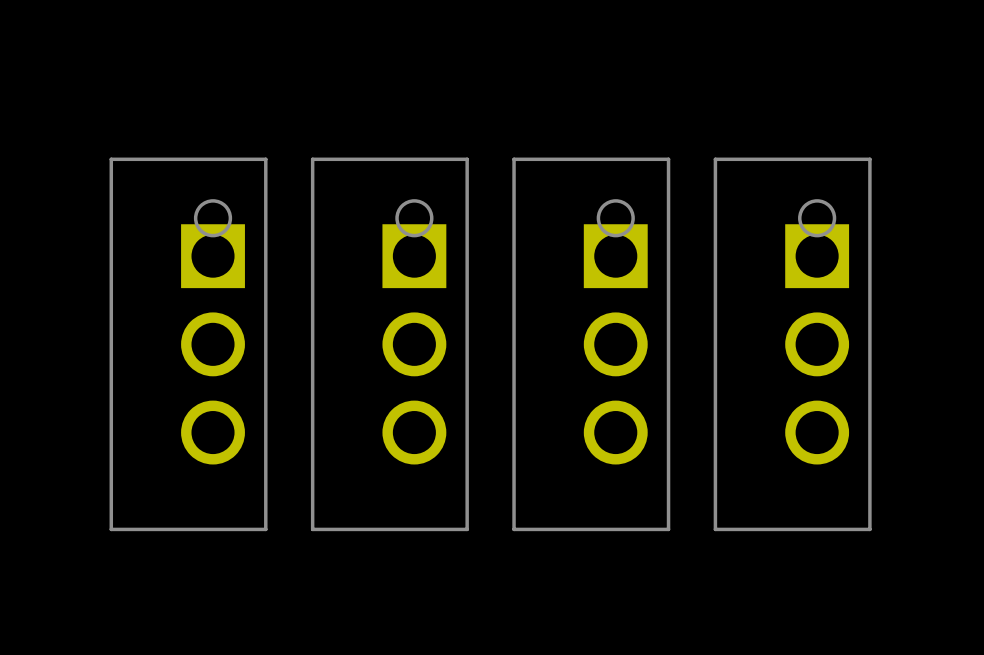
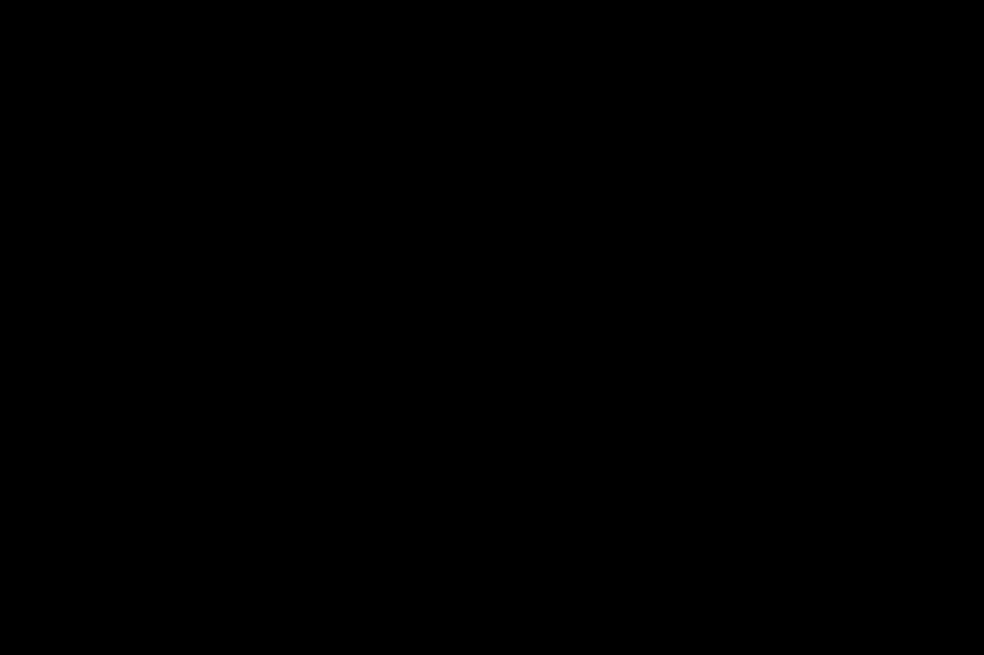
part: (188, 344) -> none
part: (389, 344) -> none
part: (591, 344) -> none
part: (792, 344) -> none

